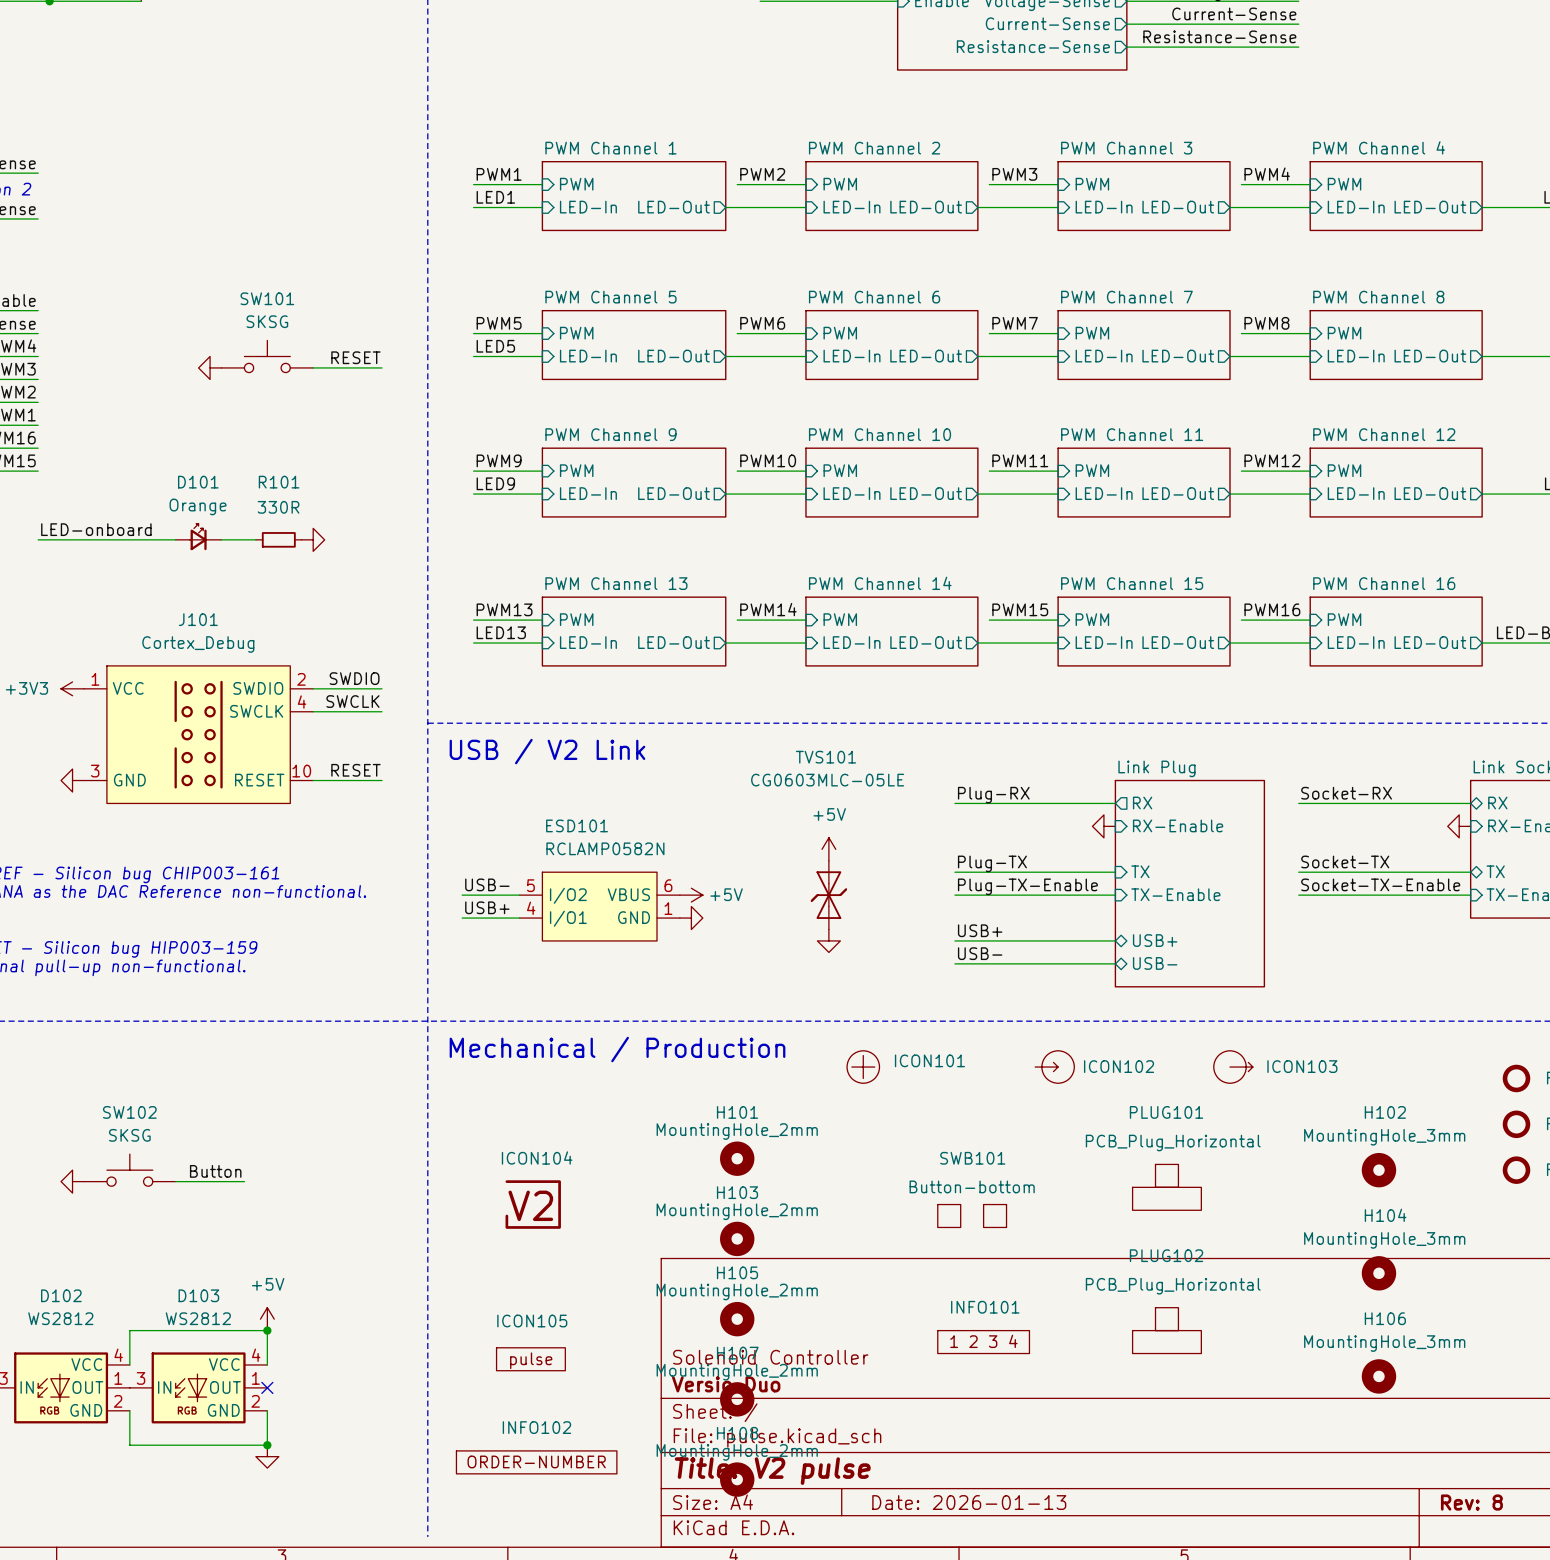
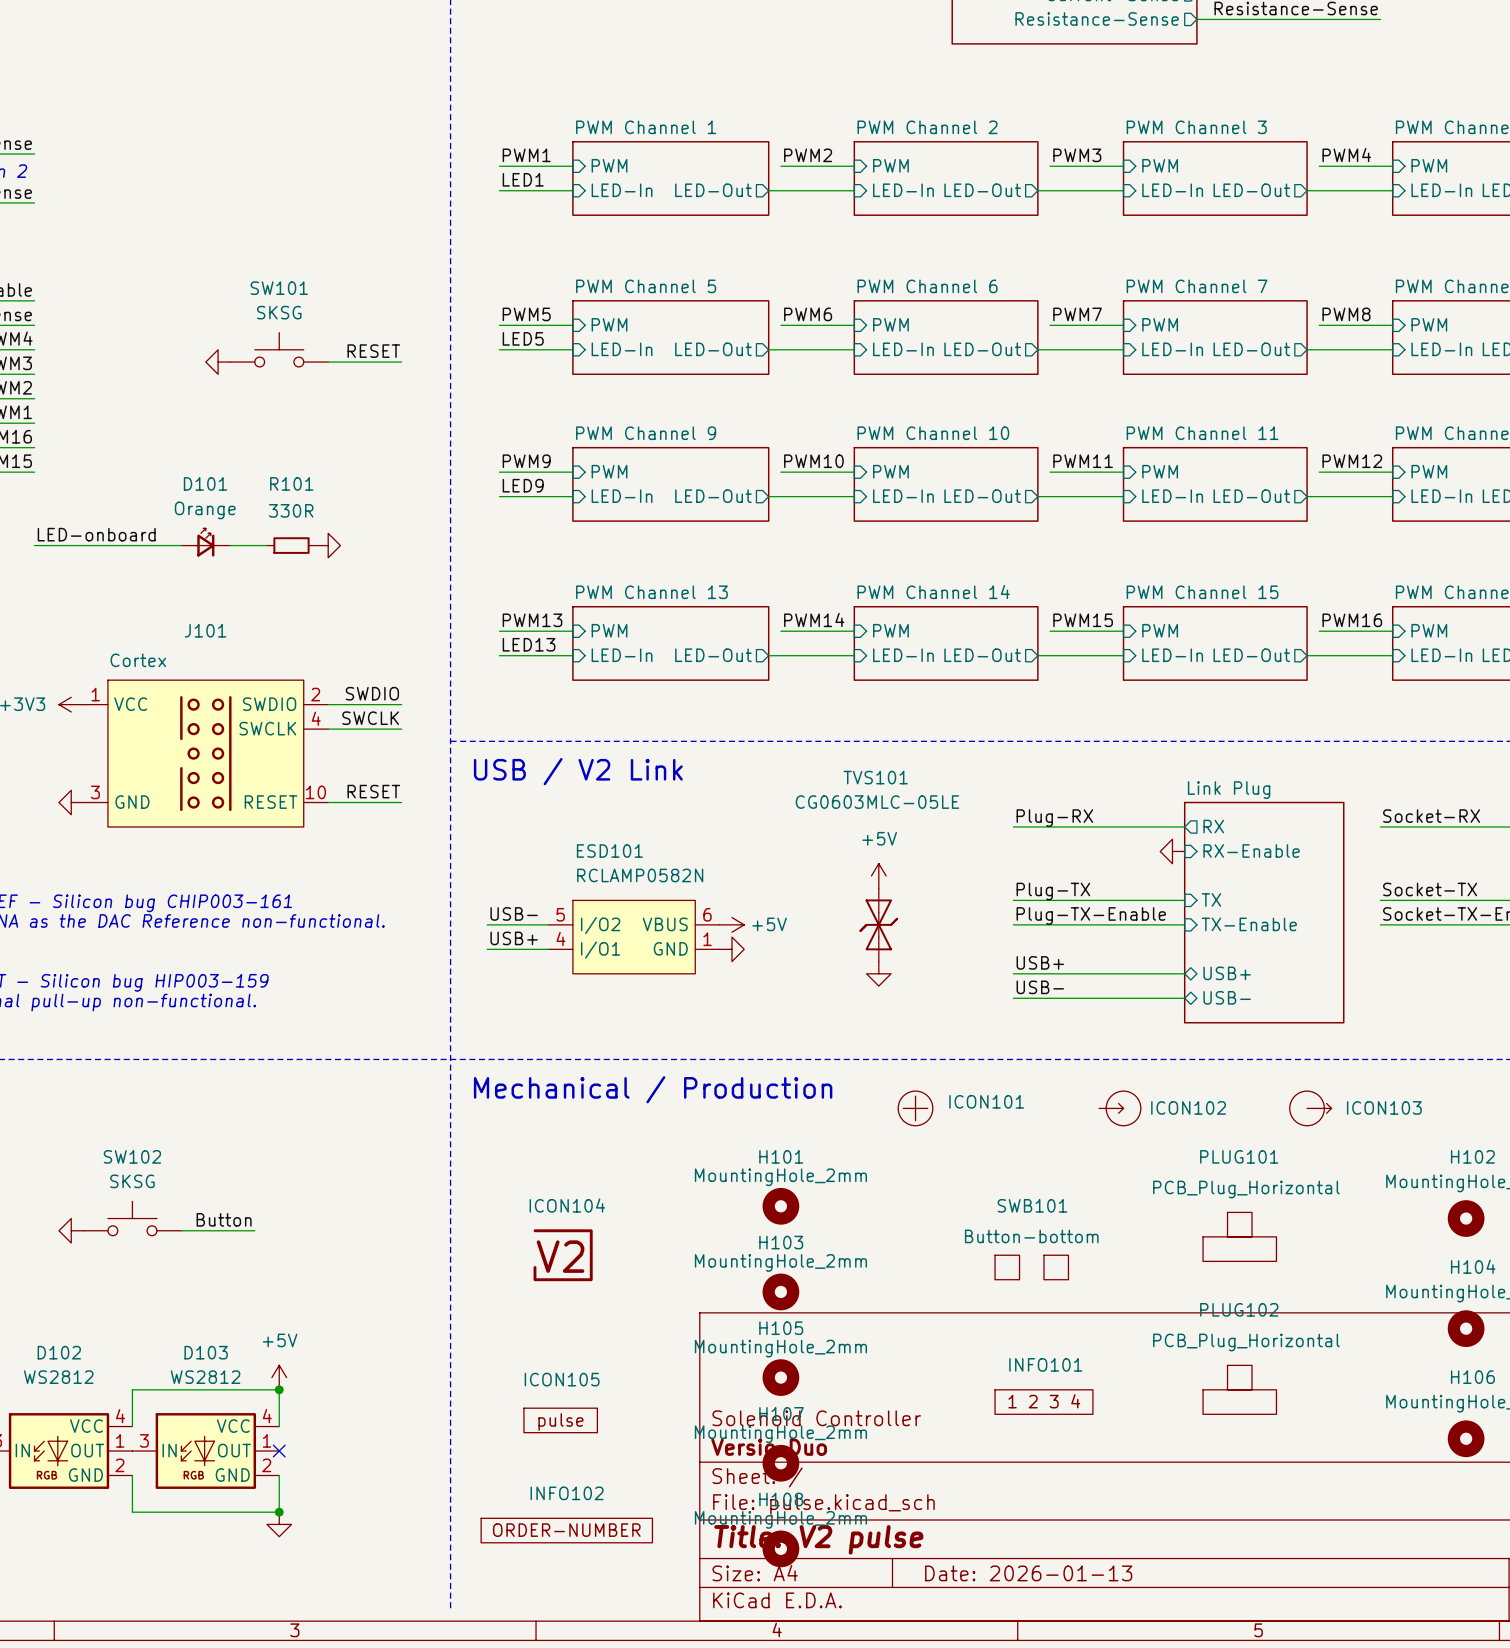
J101 value: Cortex_Debug (198, 644) -> Cortex (138, 660)

